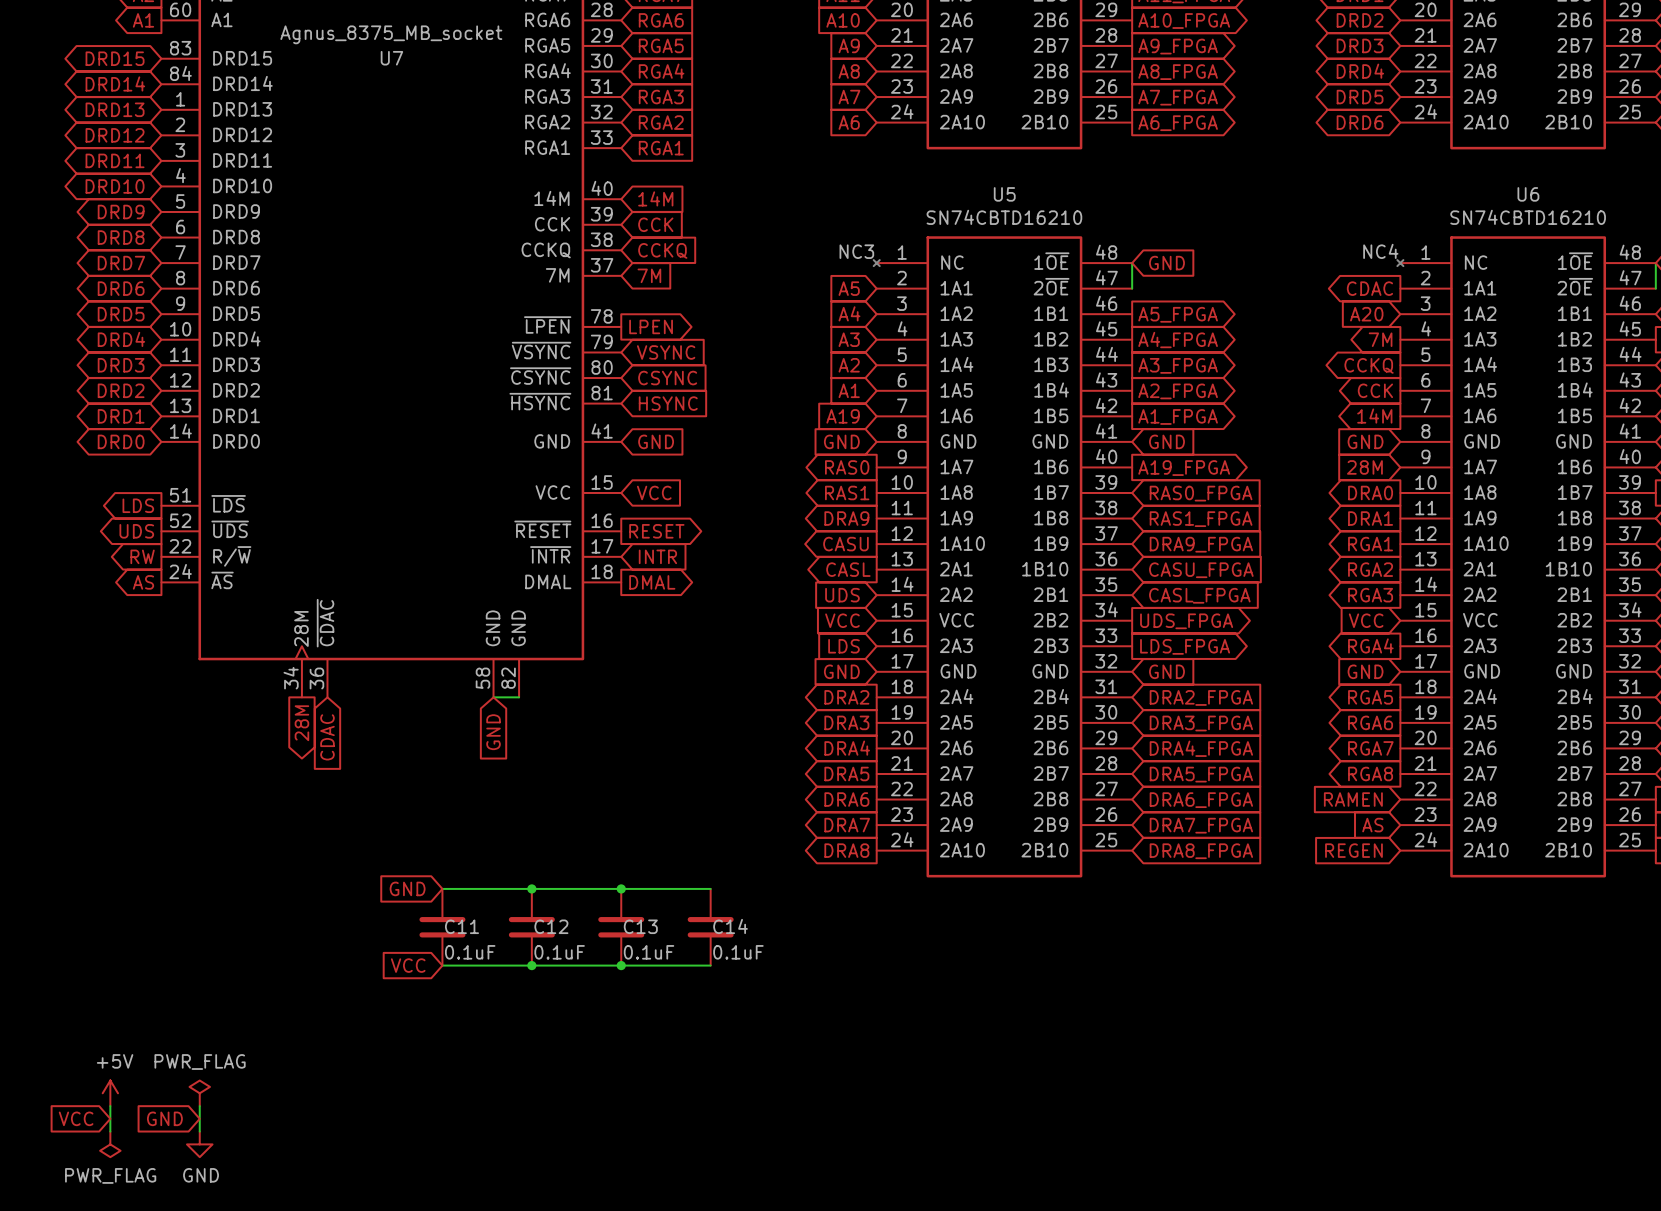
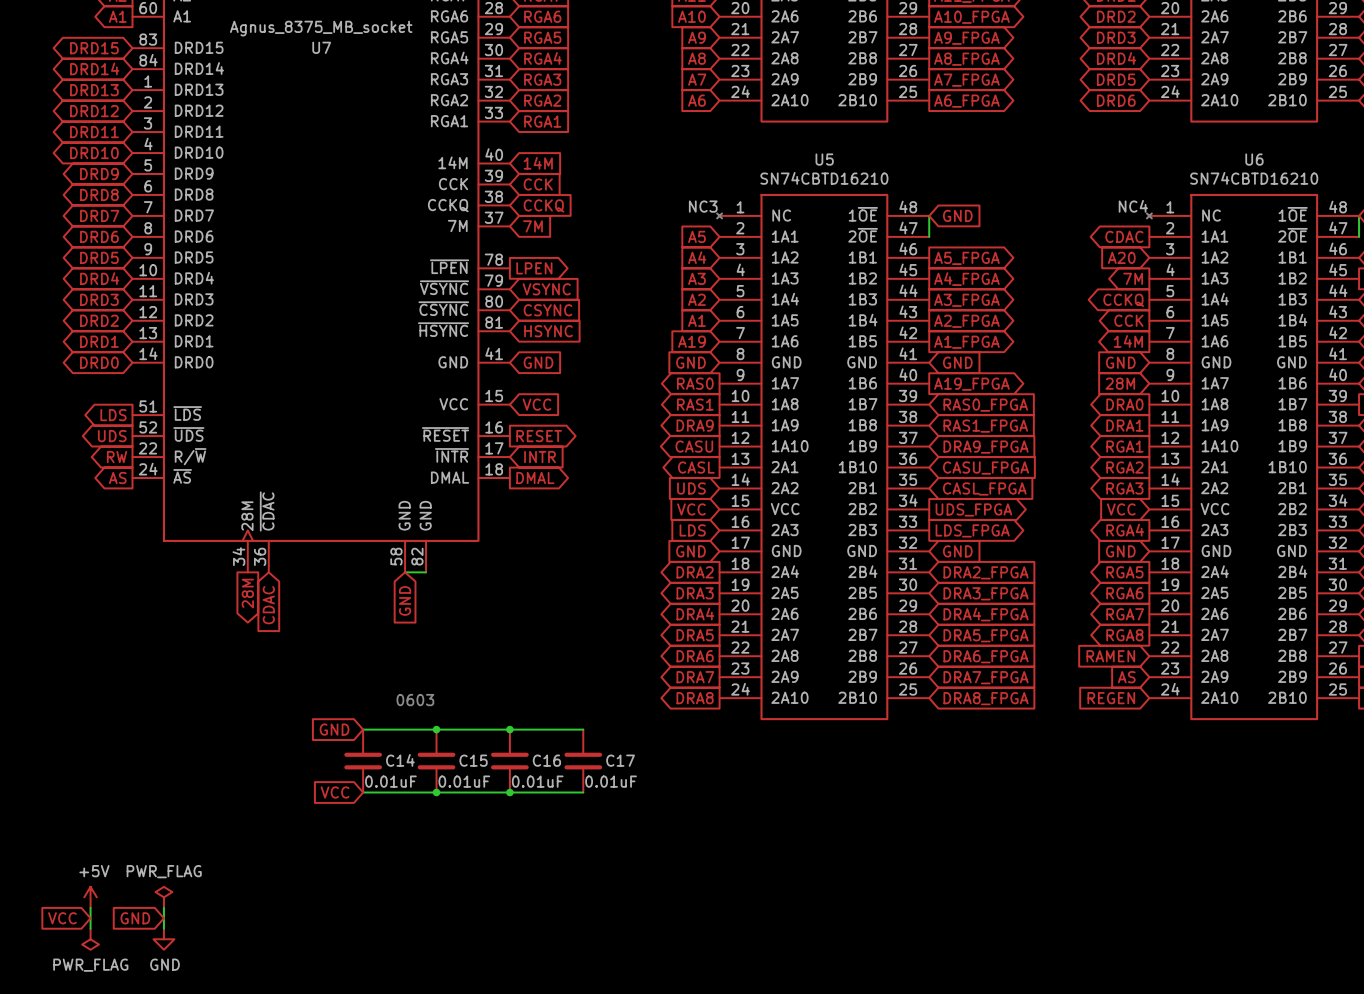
text: none -> 0603 (415, 700)
C11 name: C11 (461, 926) -> C14 (400, 760)
C12 name: C12 (551, 926) -> C15 (473, 760)
C13 name: C13 (640, 926) -> C16 (546, 760)
C14 name: C14 (730, 926) -> C17 (620, 760)
C11 value: 0.1uF (470, 952) -> 0.01uF (390, 781)
C12 value: 0.1uF (559, 952) -> 0.01uF (464, 781)
C13 value: 0.1uF (649, 952) -> 0.01uF (537, 781)
C14 value: 0.1uF (738, 952) -> 0.01uF (611, 781)

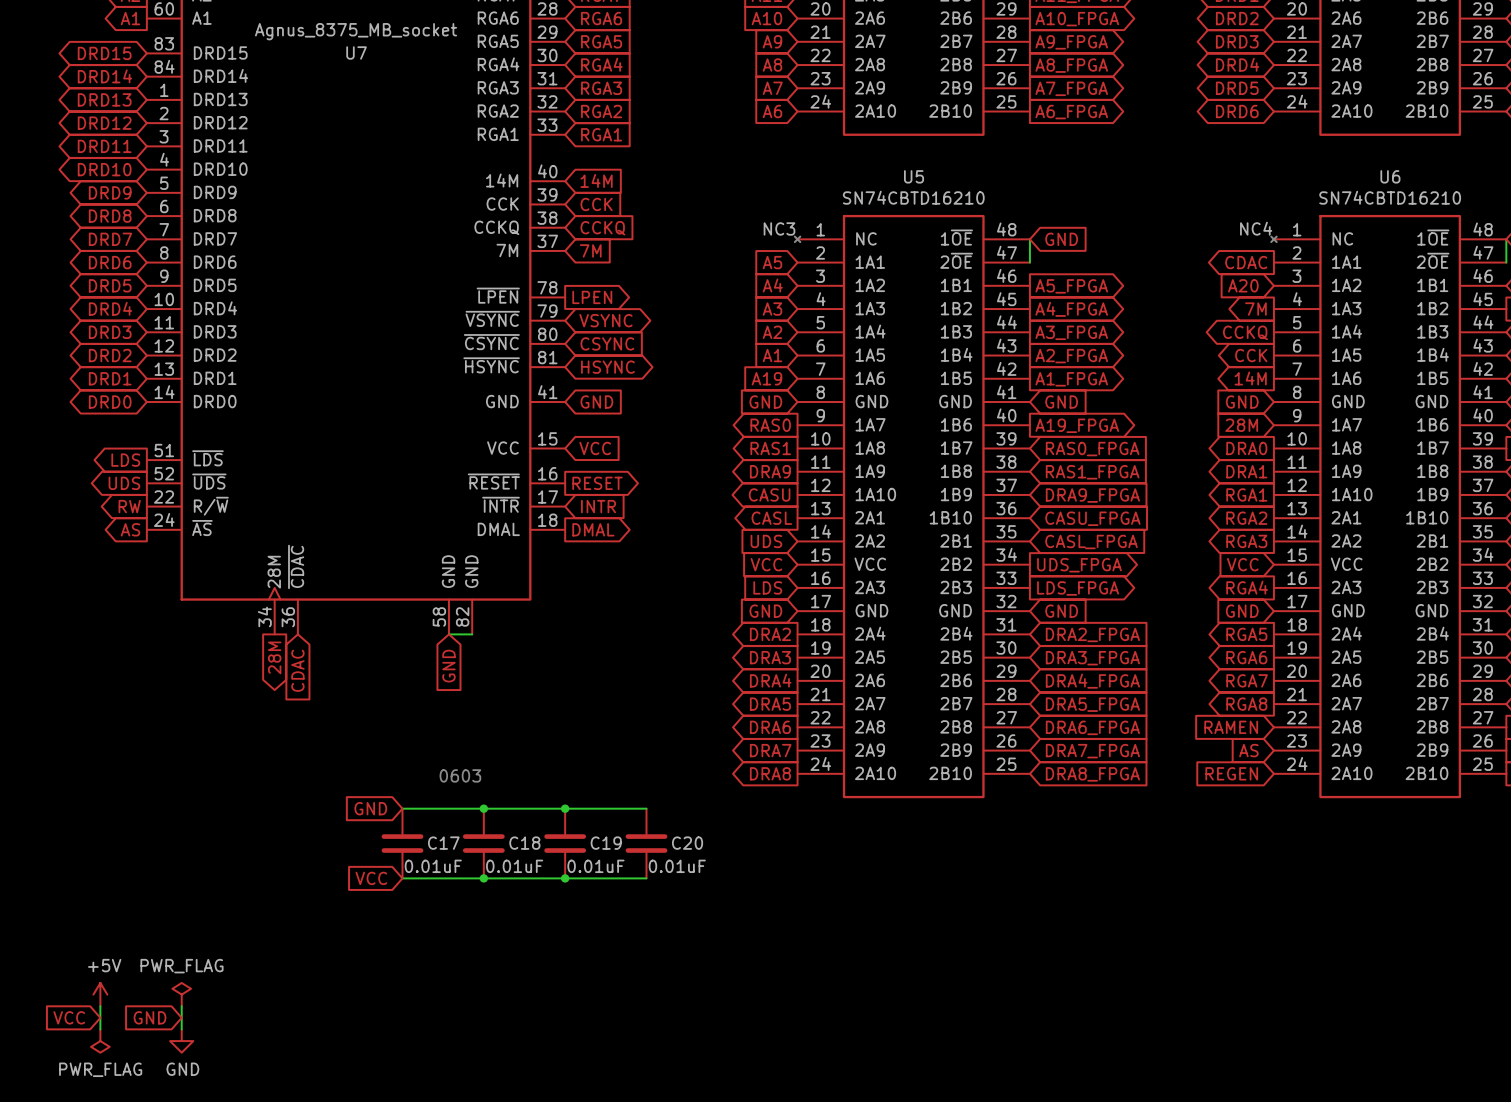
global label shape: input (546, 289) -> bidirectional (605, 320)
global label shape: input (548, 331) -> bidirectional (607, 367)
C14 name: C14 (400, 760) -> C17 (443, 843)
C15 name: C15 (473, 760) -> C18 (524, 843)
C16 name: C16 (546, 760) -> C19 (606, 843)
C17 name: C17 (620, 760) -> C20 (687, 843)

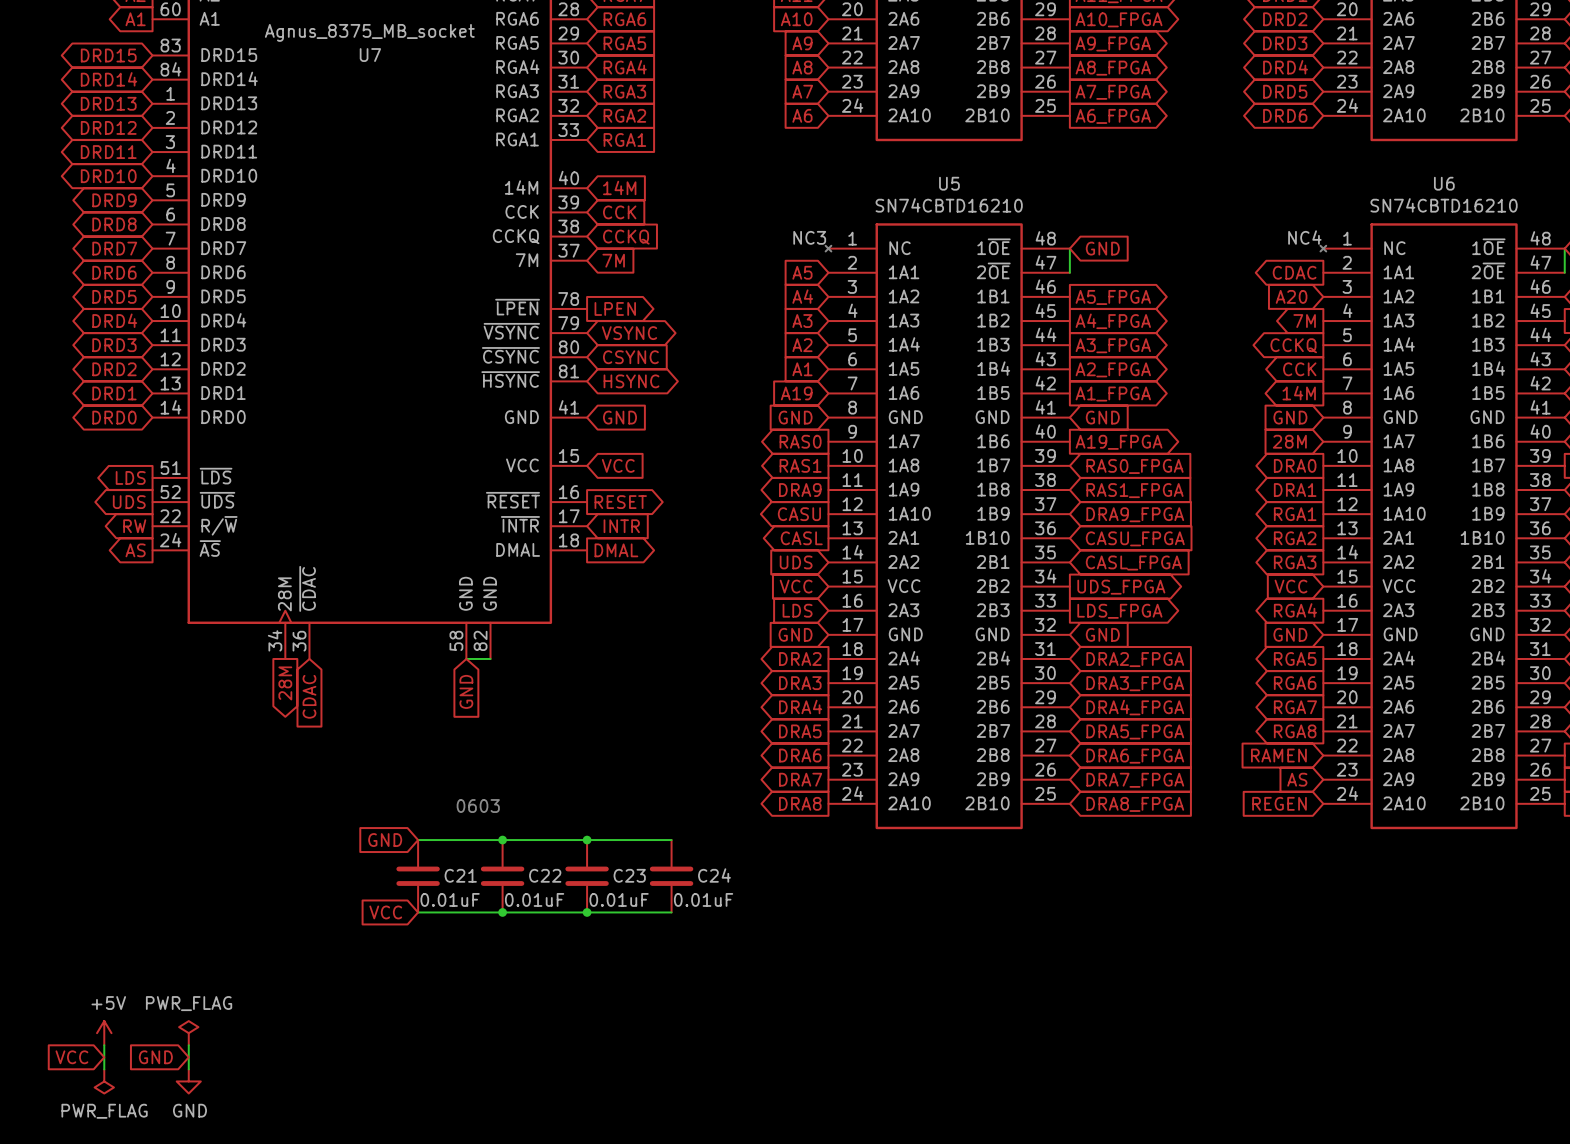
C17 name: C17 (443, 843) -> C21 (460, 875)
C18 name: C18 (524, 843) -> C22 (545, 875)
C19 name: C19 (606, 843) -> C23 (629, 875)
C20 name: C20 (687, 843) -> C24 (714, 875)

